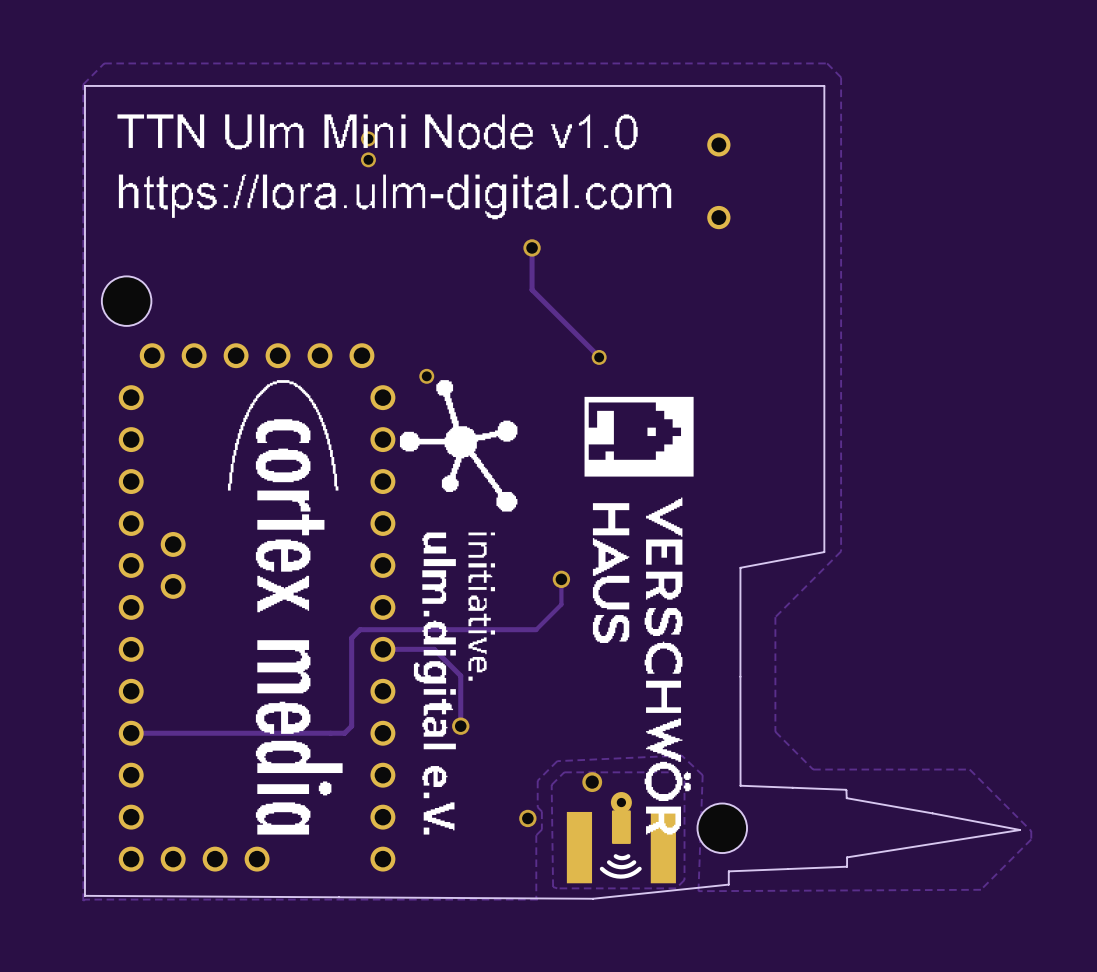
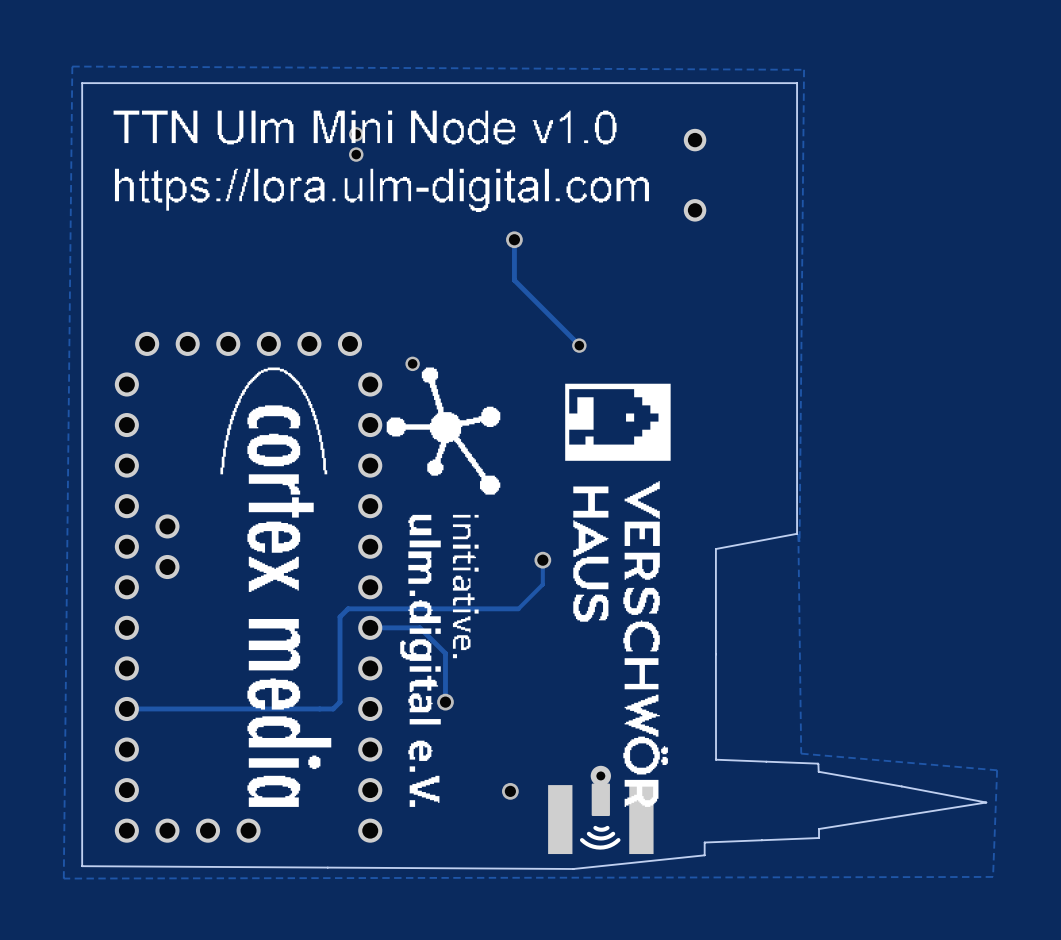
zone outline: (827, 63) (104, 63) (83, 84) (83, 900) (537, 899) (536, 835) (541, 829) (541, 811) (537, 807) (537, 780) (557, 761) (681, 755) (702, 775) (698, 891) (980, 889) (1031, 839) (1031, 831) (969, 769) (813, 769) (775, 731) (775, 617) (841, 551) (841, 77) (827, 63) -> (72, 66) (804, 69) (799, 541) (798, 534) (801, 753) (997, 770) (993, 876) (63, 878) (72, 66)
hole: (126, 301) -> none
zone outline: (676, 772) (564, 772) (551, 784) (553, 886) (676, 888) (684, 880) (684, 780) (676, 772) -> none
via: (592, 782) -> none
hole: (722, 828) -> none

